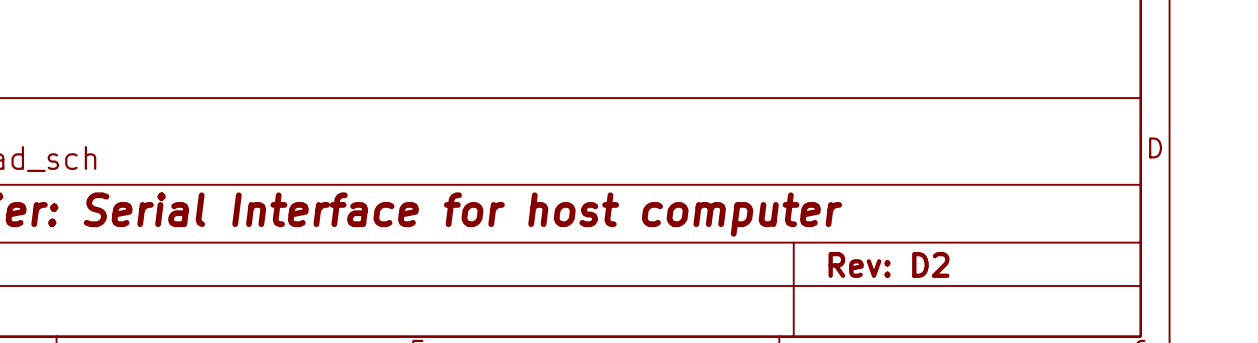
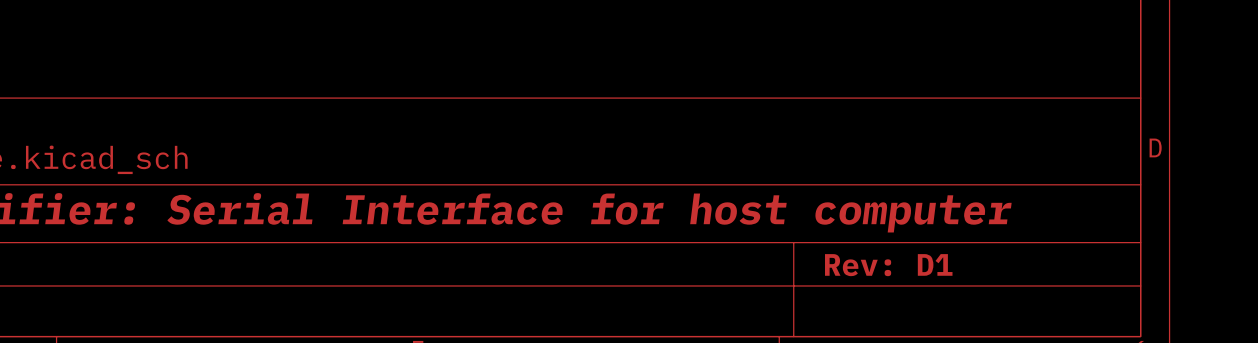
title block: Rev: D2 (888, 264) -> Rev: D1 (888, 265)

